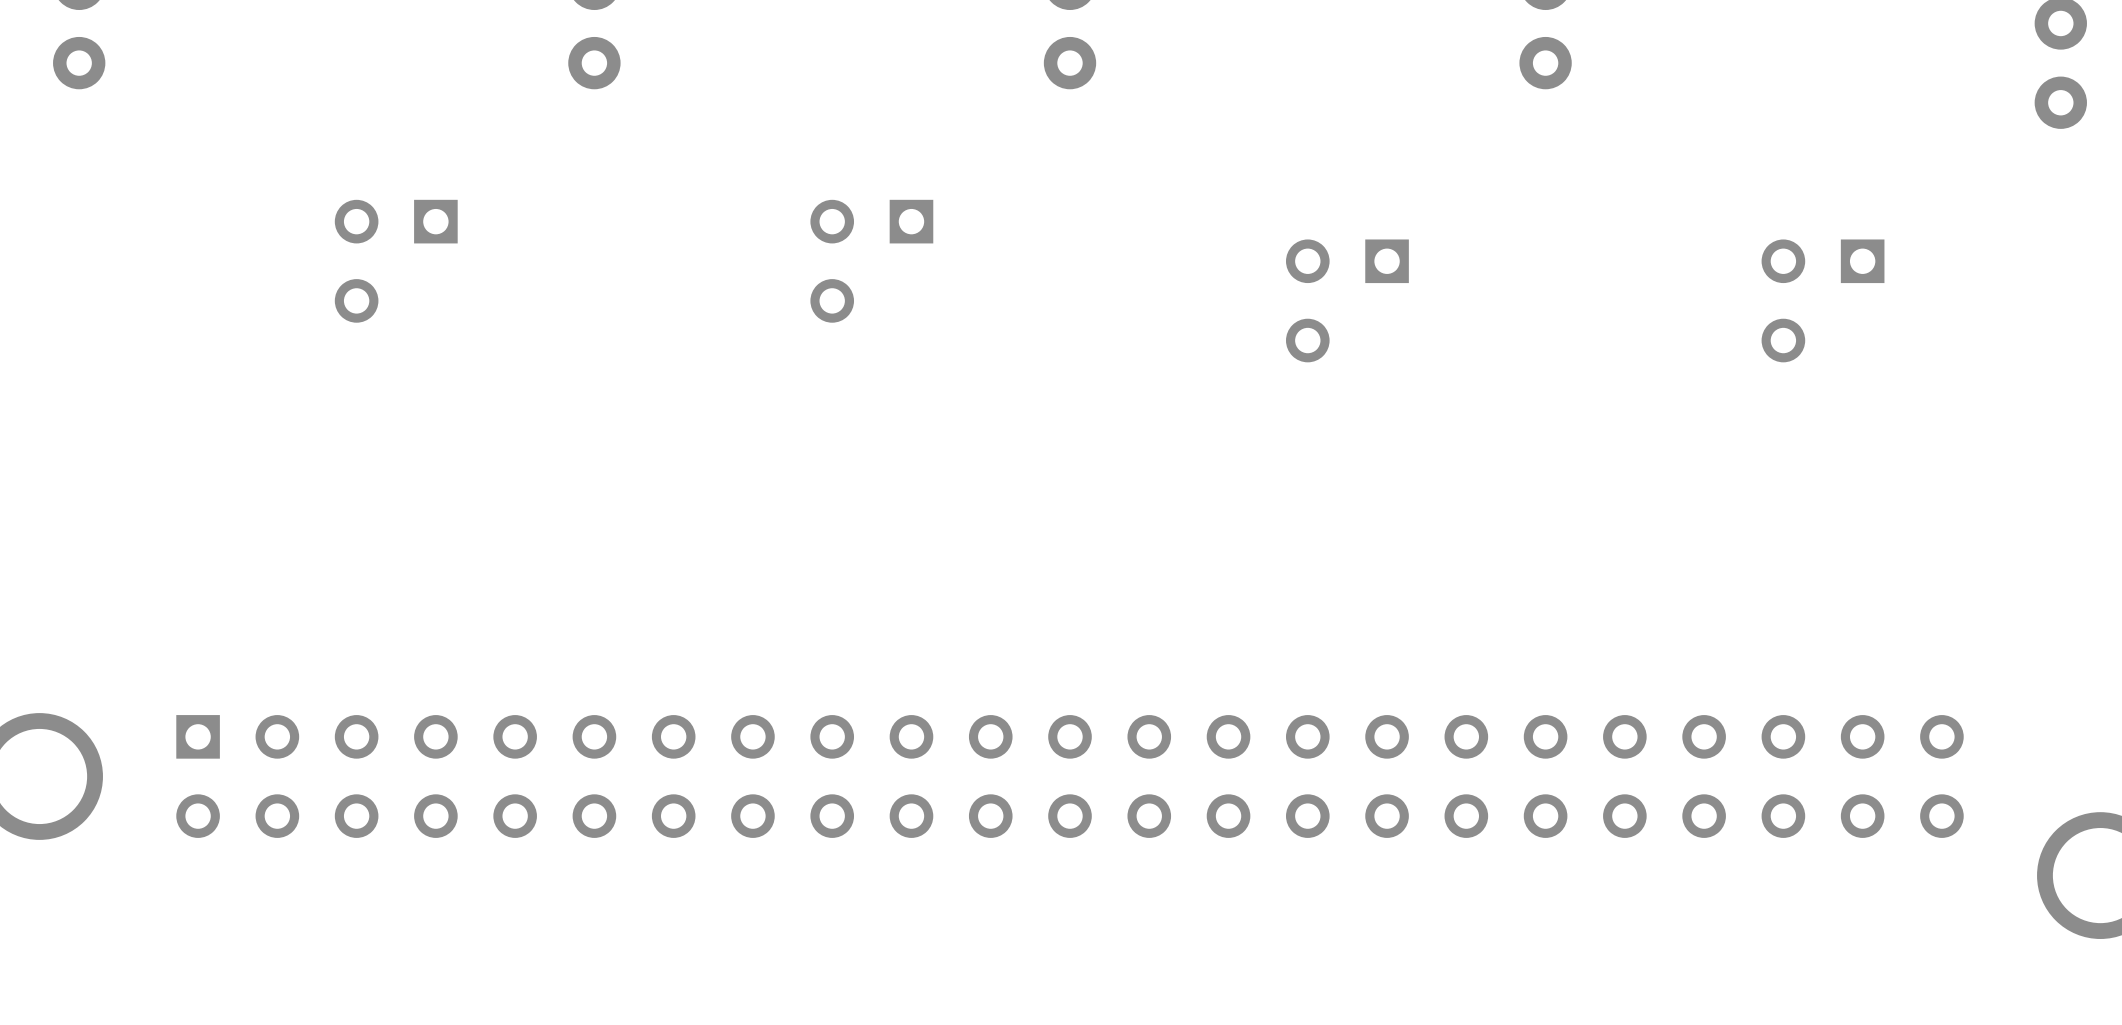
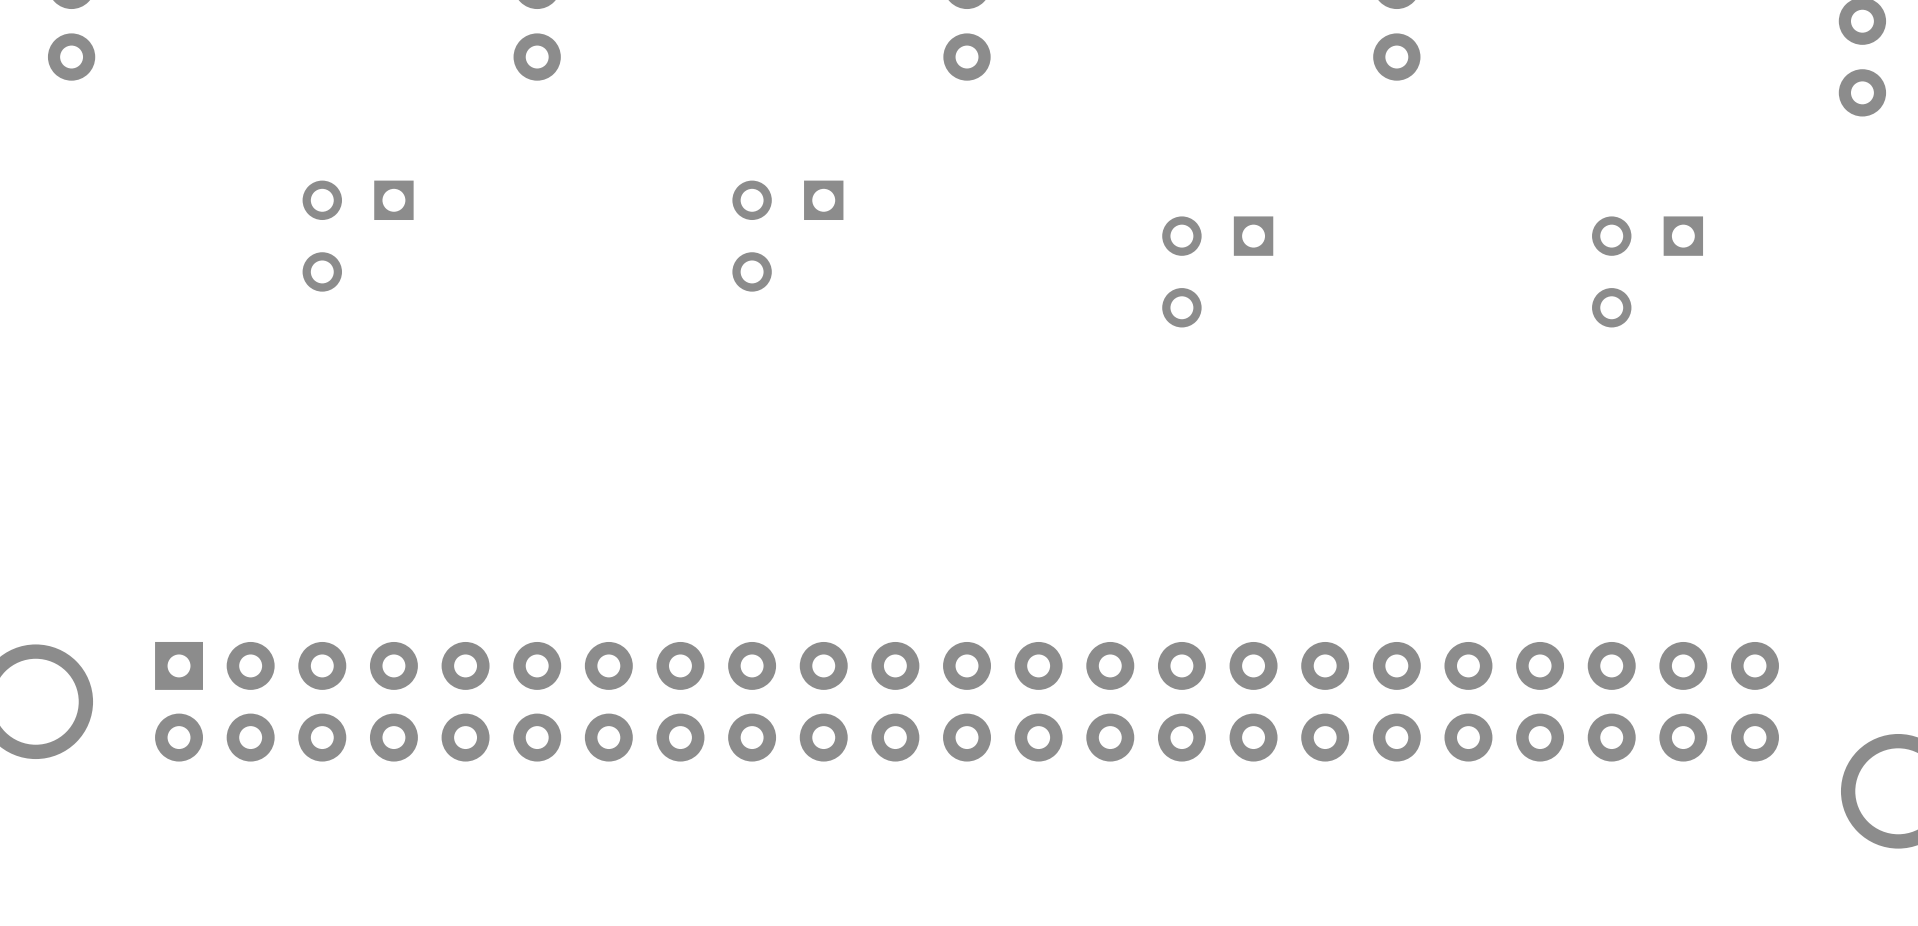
part footprint: [176, 715, 1964, 838] -> [155, 641, 1779, 762]

